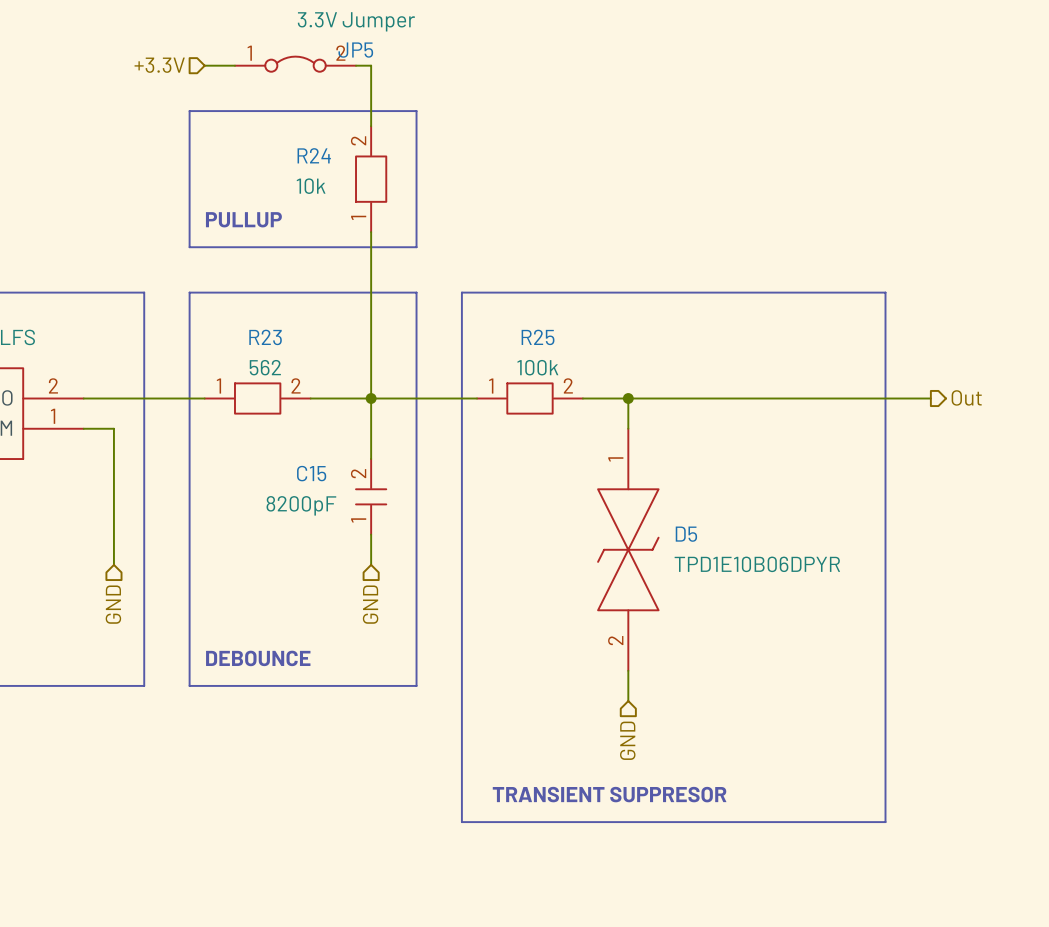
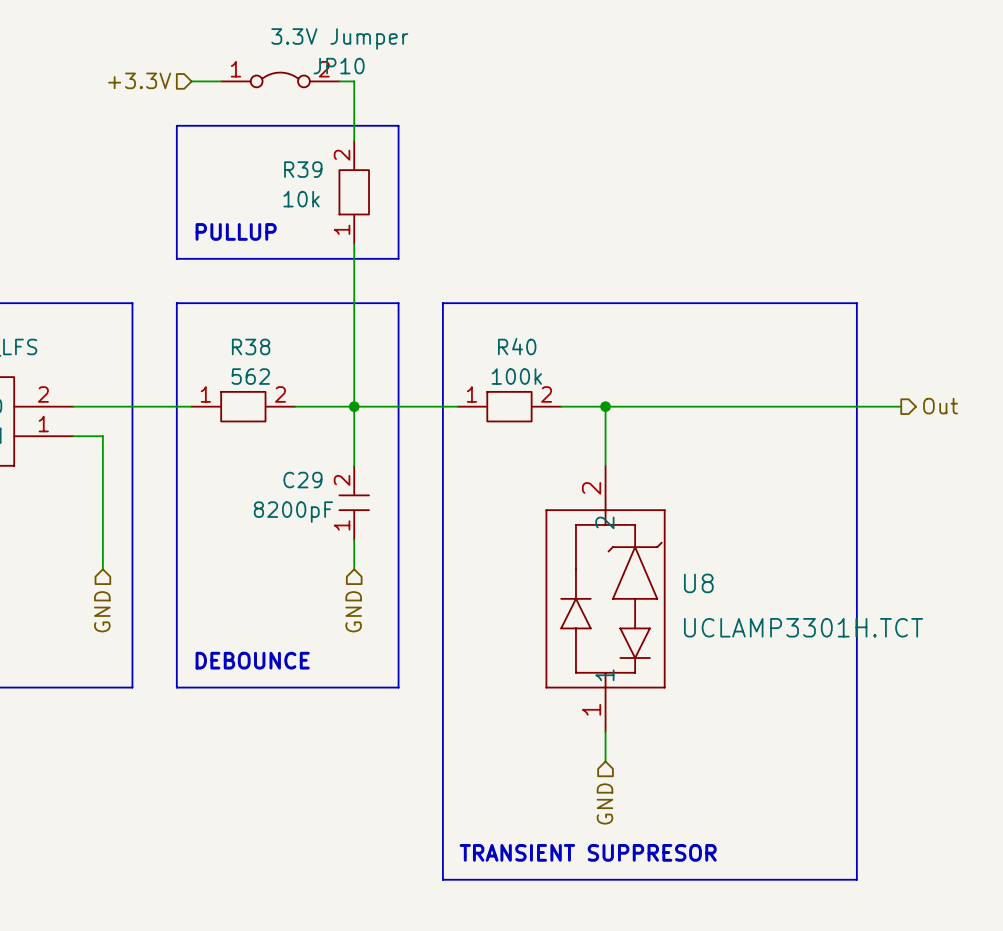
JP5 name: JP5 (355, 50) -> JP10 (339, 66)
R24 name: R24 (314, 155) -> R39 (303, 169)
R23 name: R23 (265, 337) -> R38 (251, 346)
R25 name: R25 (538, 337) -> R40 (517, 346)
C15 name: C15 (311, 473) -> C29 (302, 480)
D5: TPD1E10B06DPYR (628, 549) -> none
U8: none -> UCLAMP3301H.TCT (605, 598)
hierarchical label position: GND (627, 740) -> GND (604, 803)
text position: TRANSIENT SUPPRESOR (609, 794) -> TRANSIENT SUPPRESOR (588, 852)
line: (461, 822) (885, 822) -> (442, 820) (442, 879) (856, 879) (856, 820)

